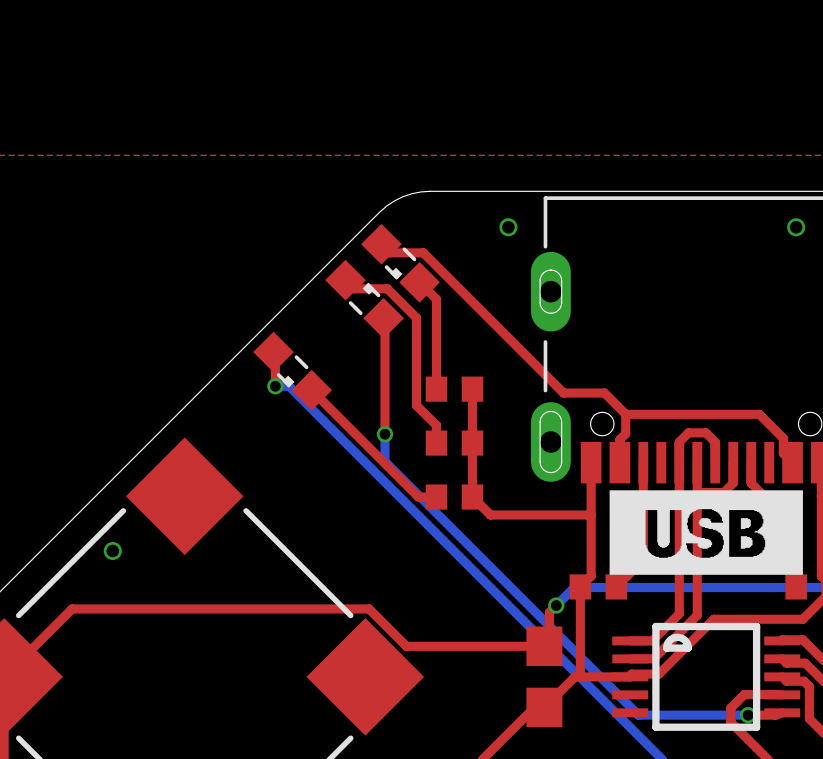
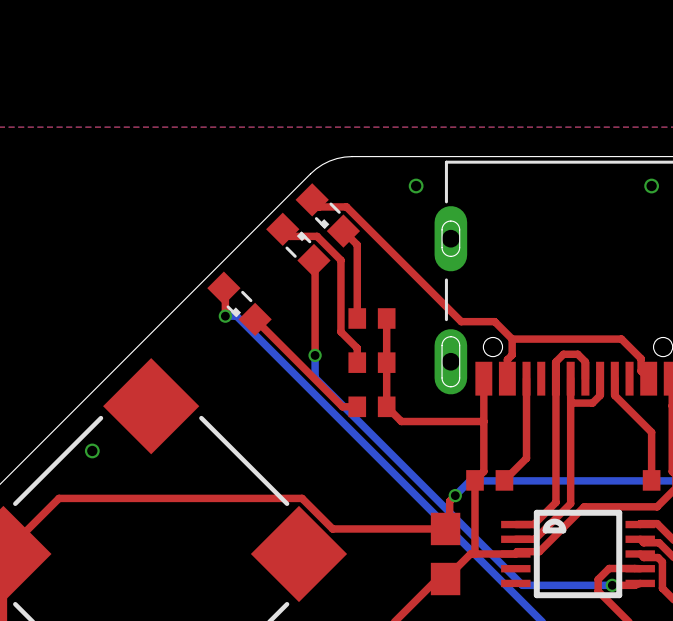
drawing: [609, 490, 803, 575] -> none

